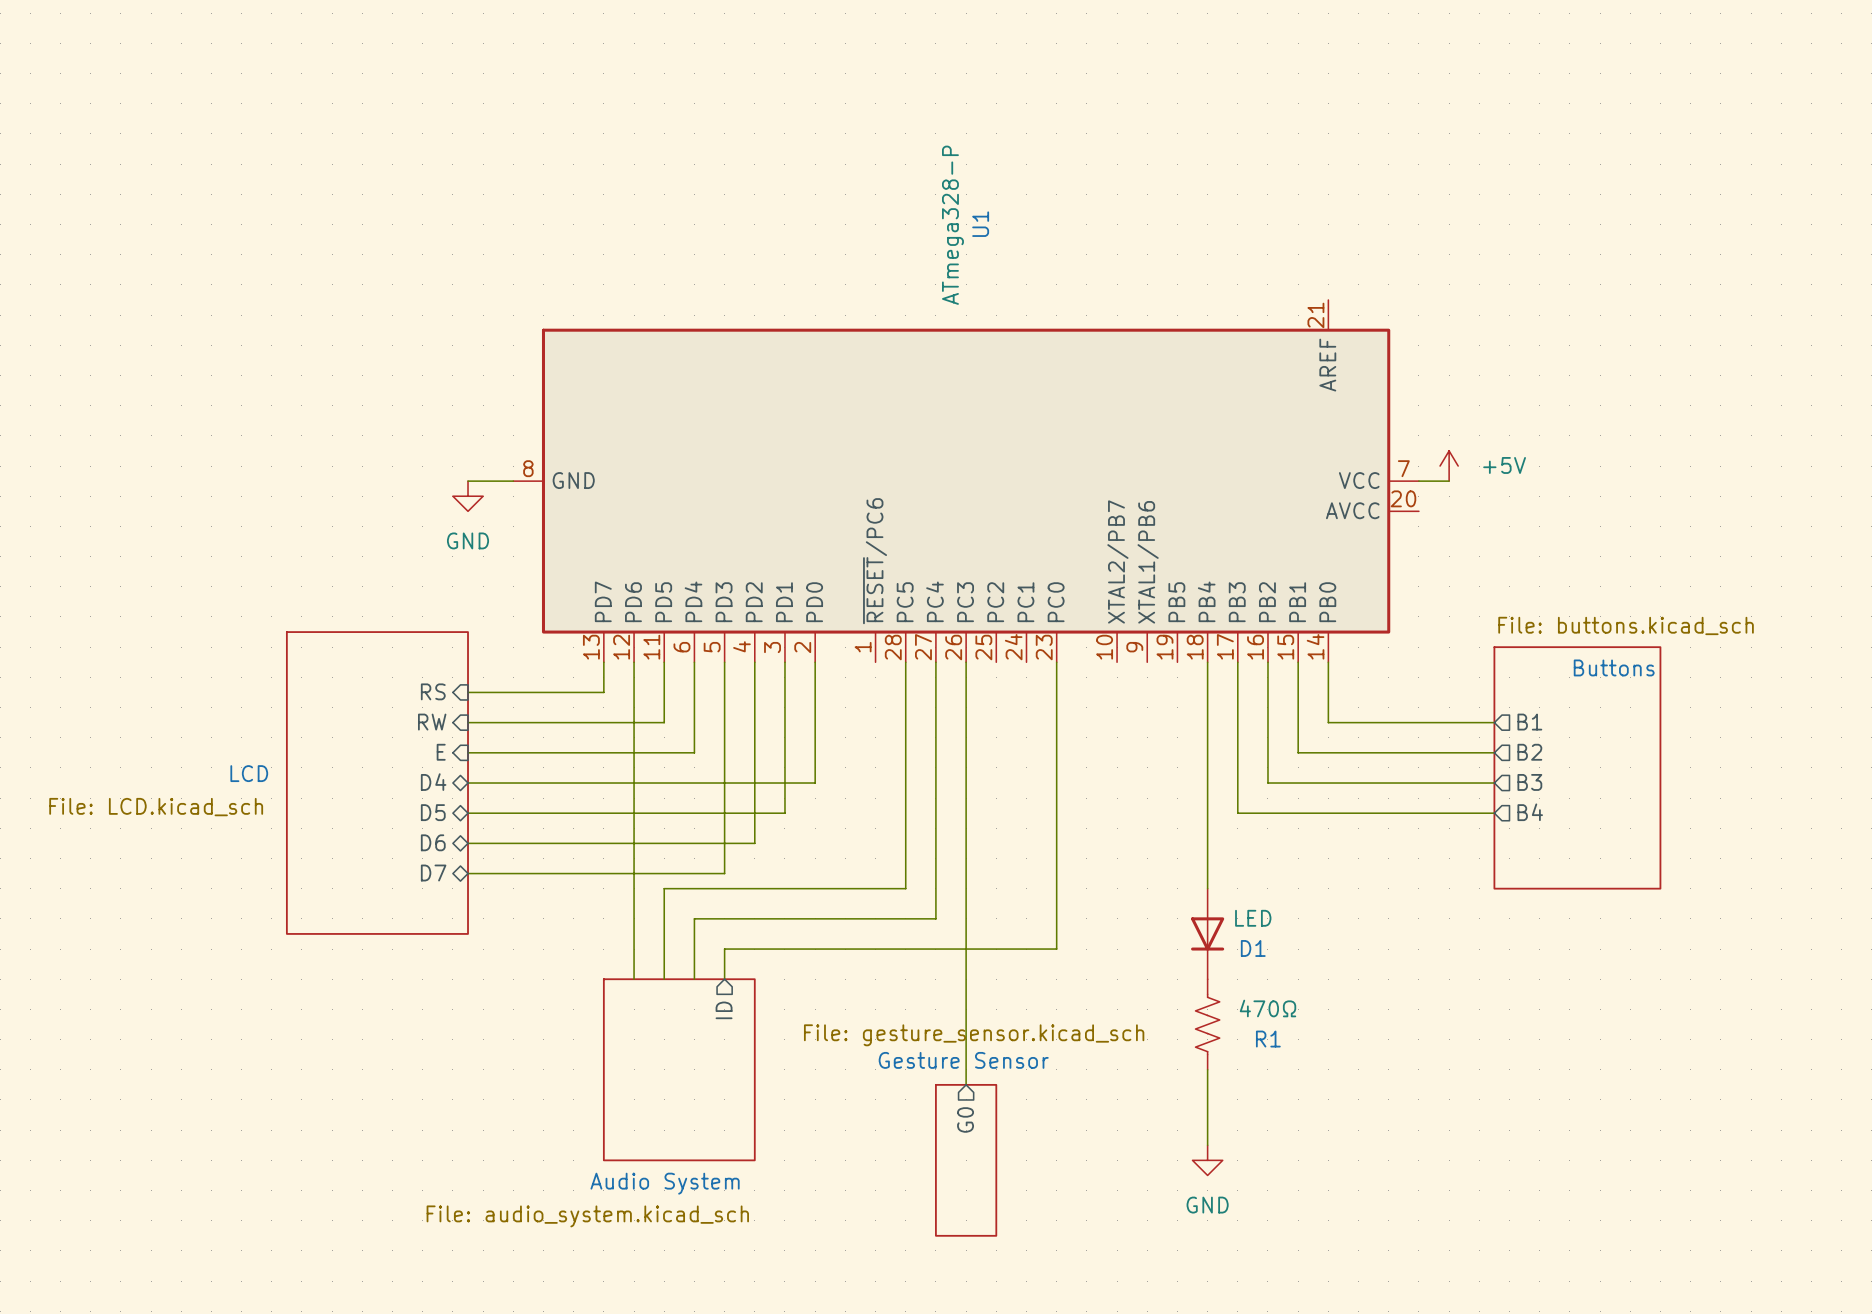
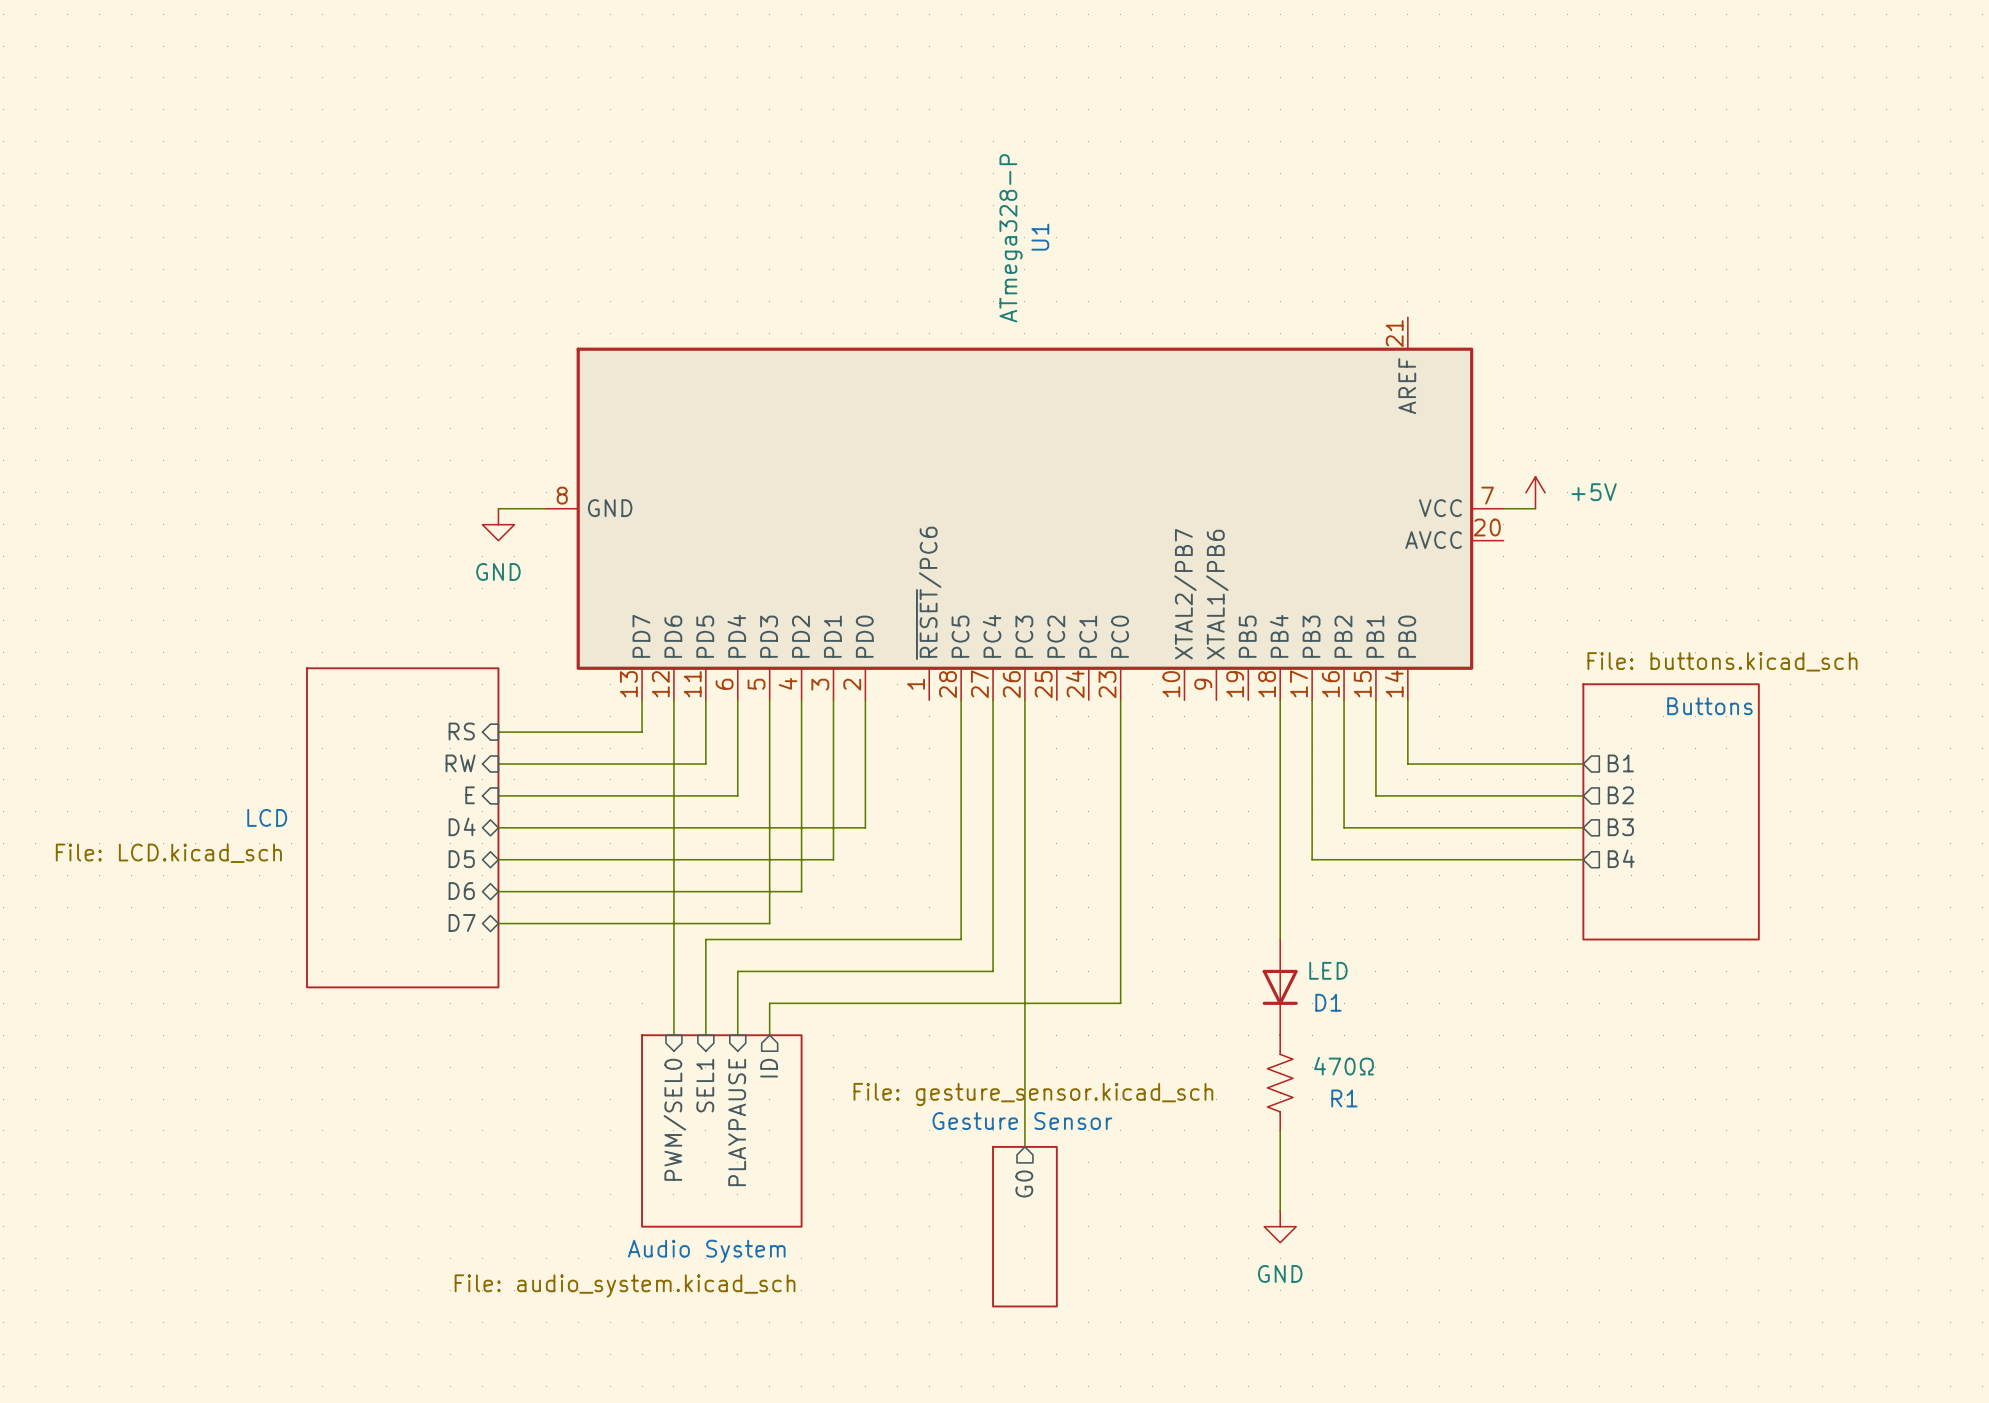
sheet pin: none -> SEL1 (705, 1085)
sheet pin: none -> PWM/SEL0 (674, 1119)
sheet pin: none -> PLAYPAUSE (737, 1122)

